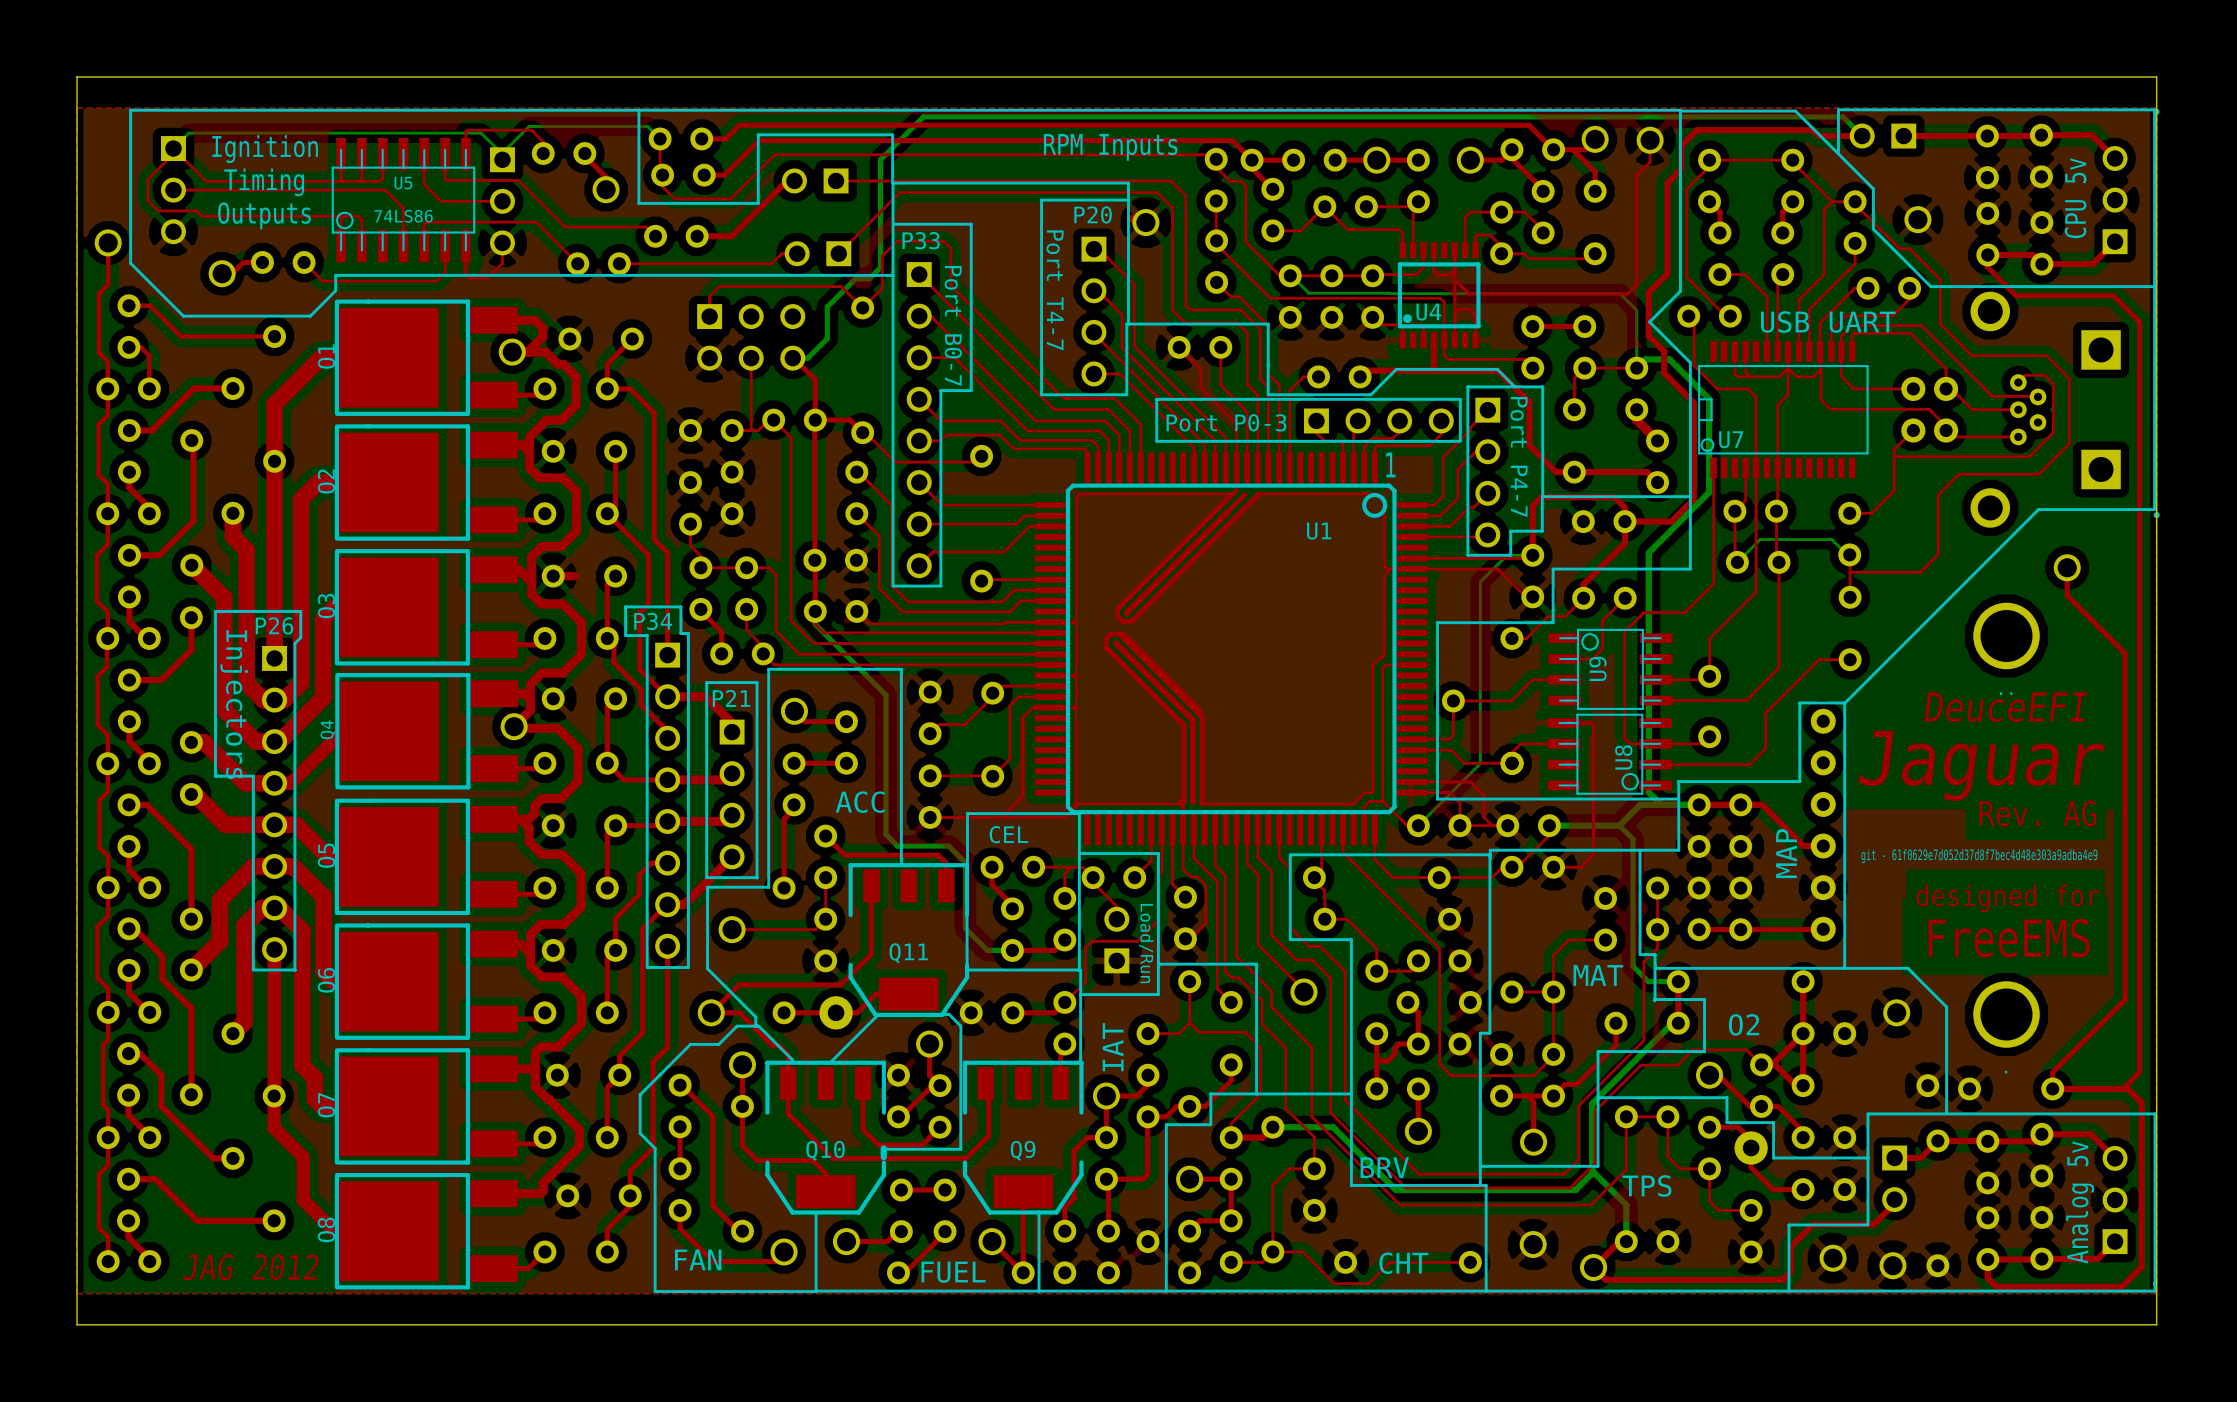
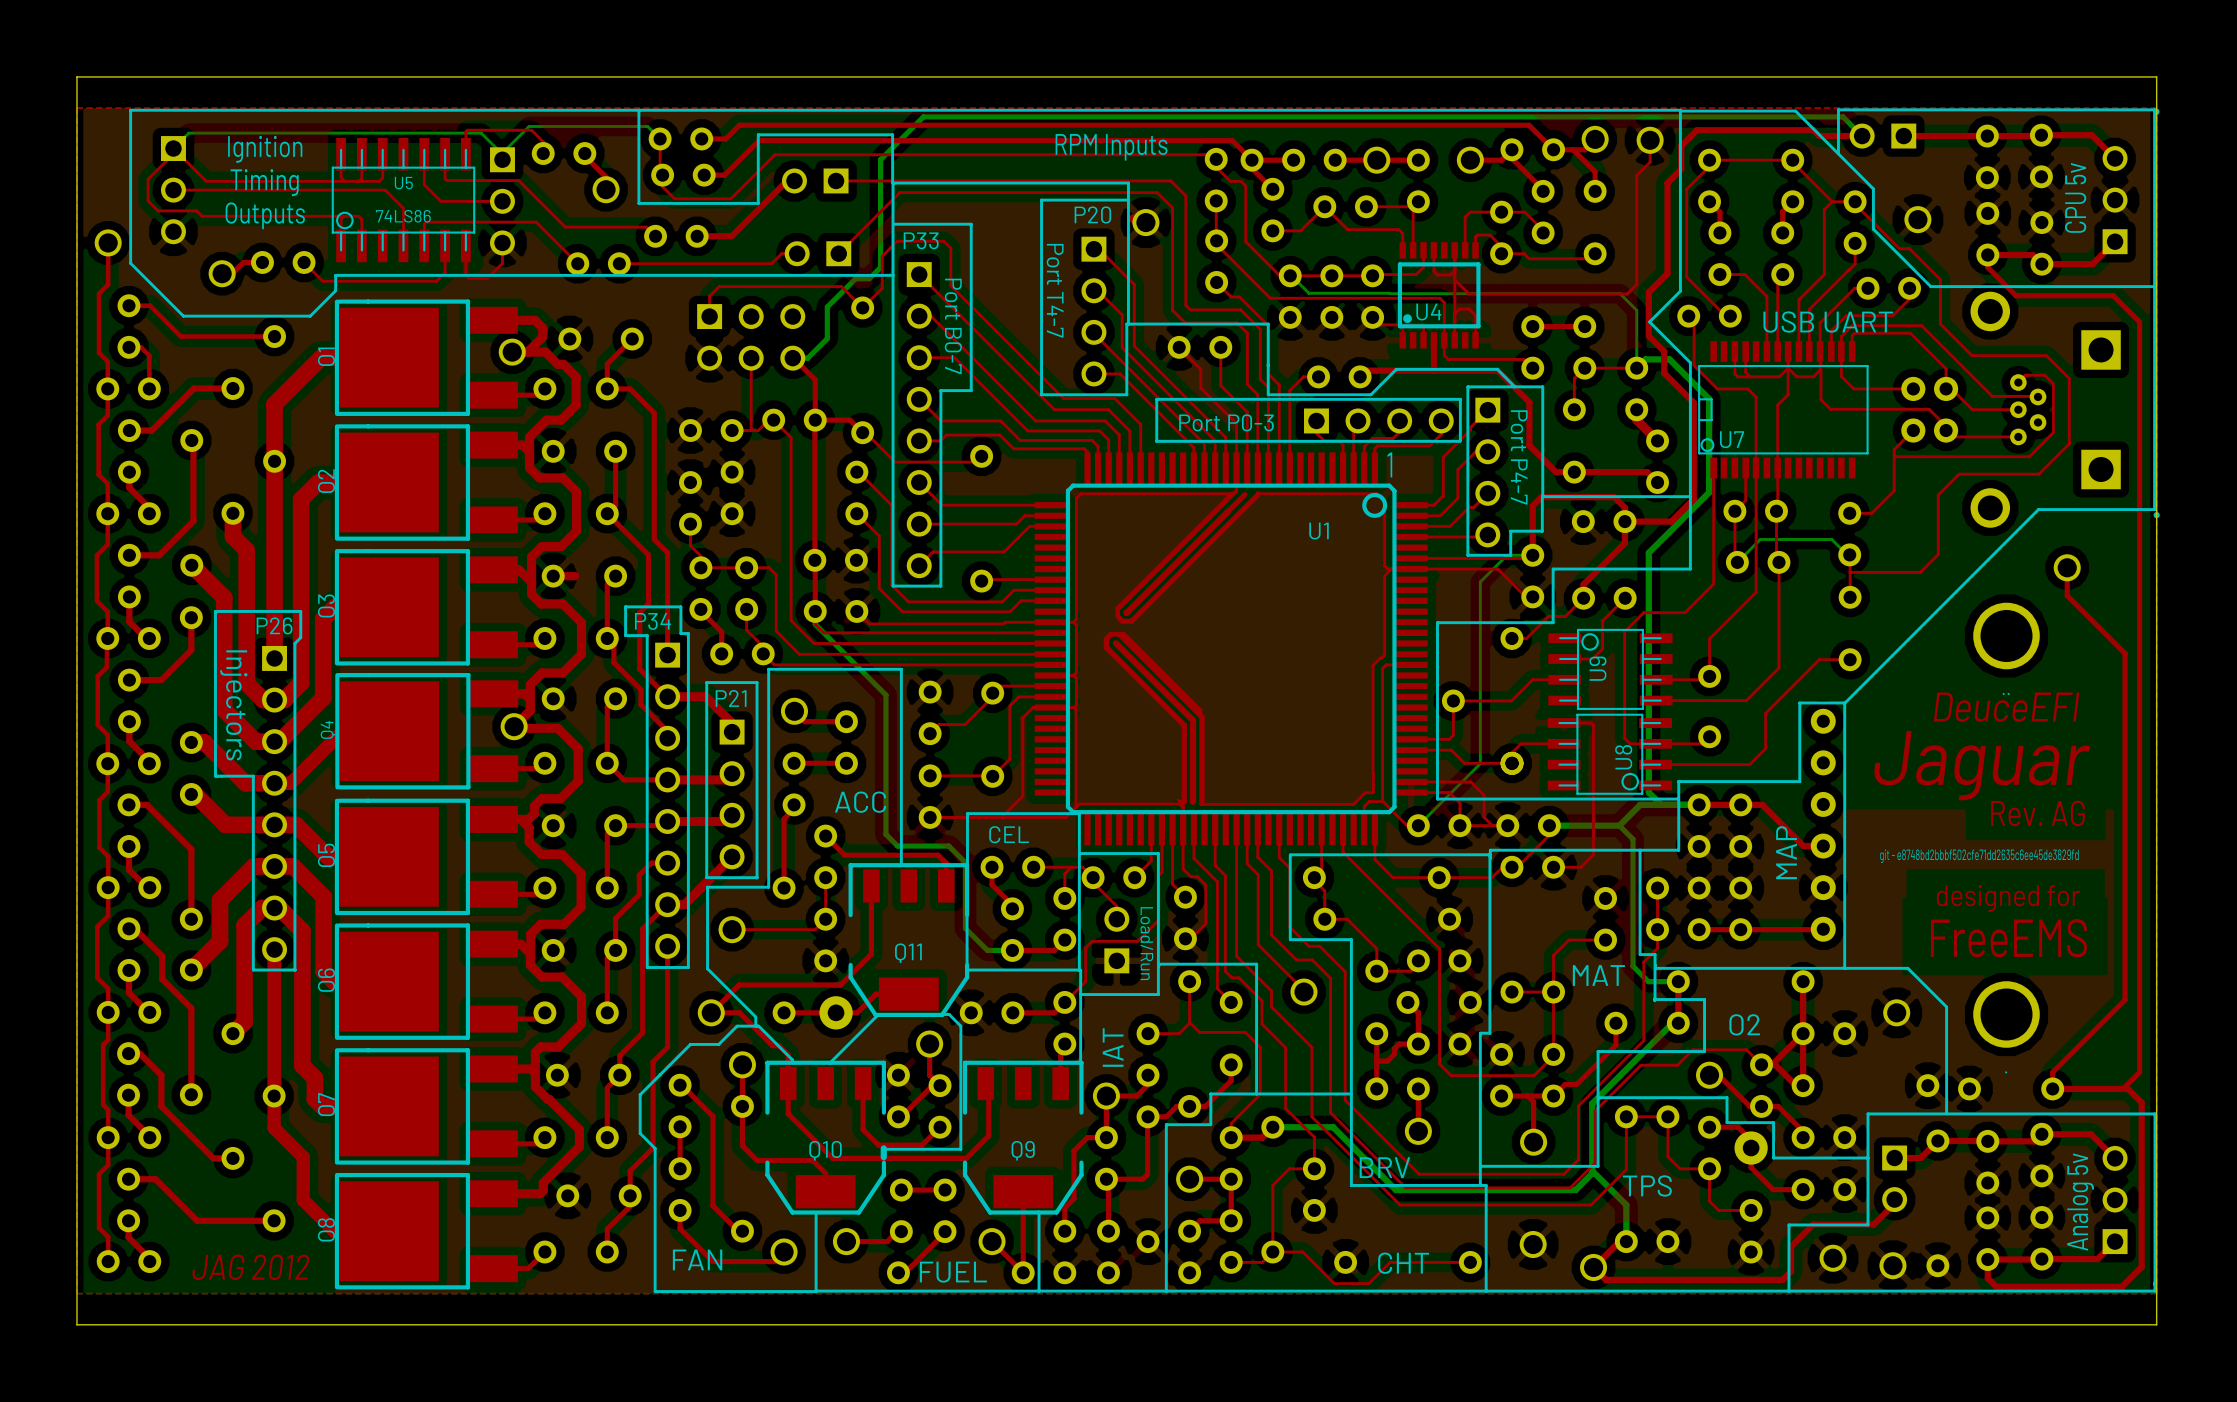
text: git - 61f0629e7d052d37d8f7bec4d48e303a9adba4e9 (1979, 856) -> git - e8748bd2bbbf502cfe71dd2635c6ee45de3829fd (1979, 856)

